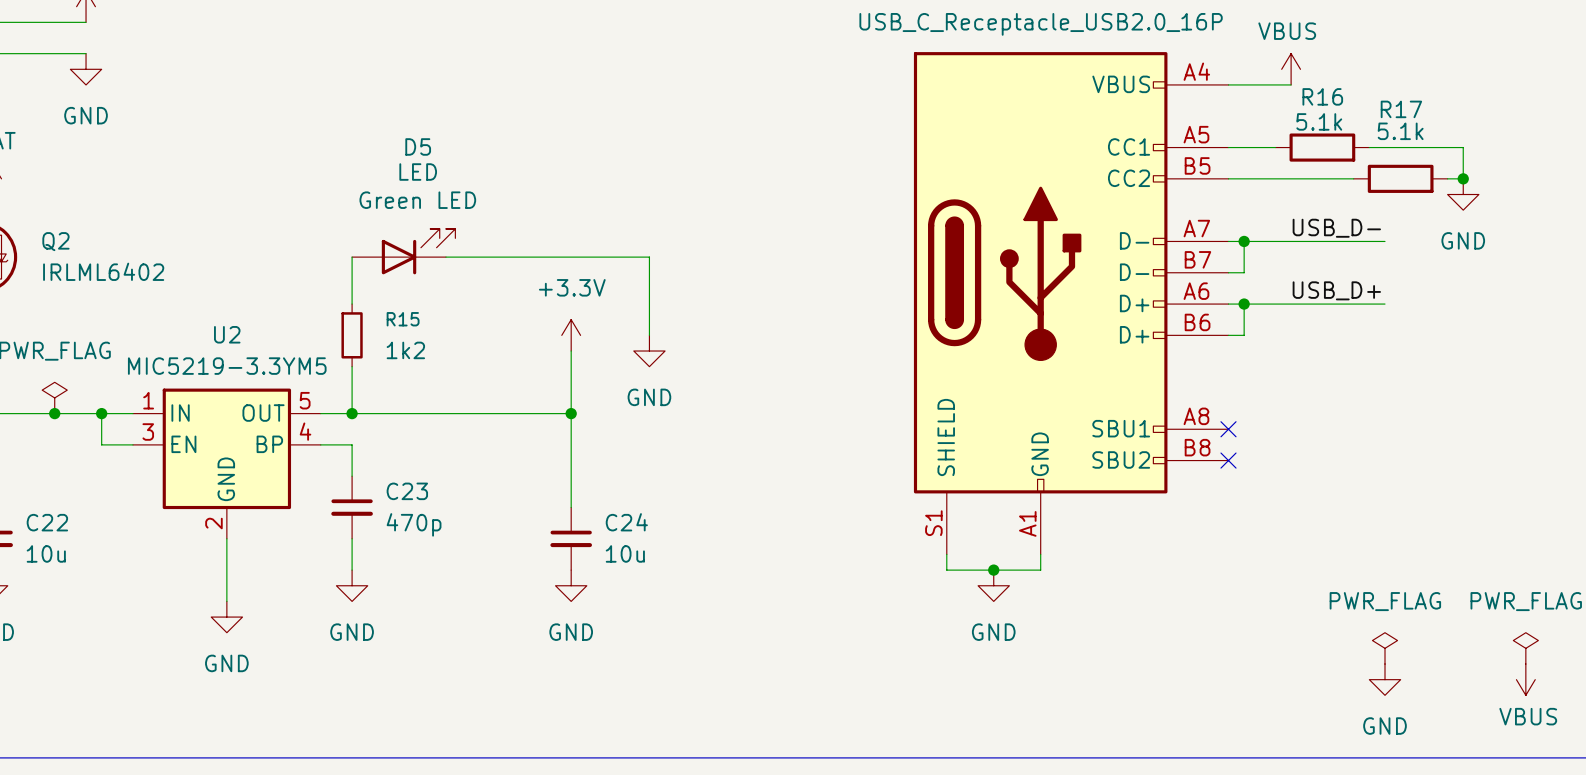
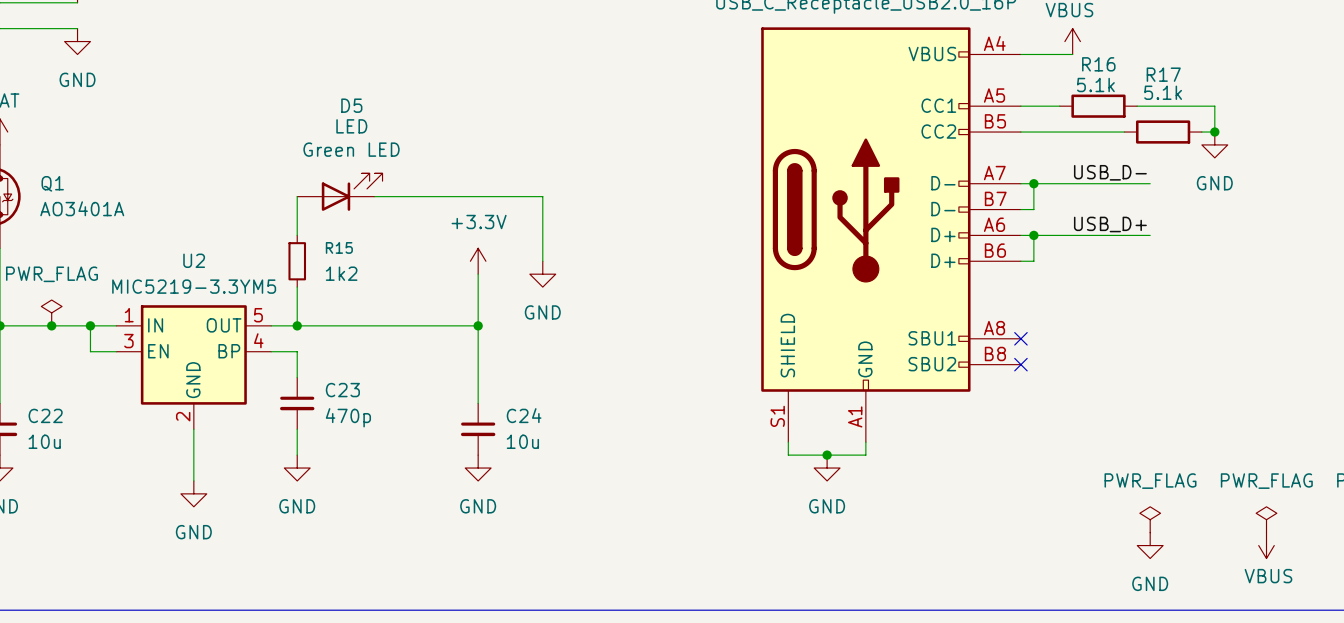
Q2 name: Q2 (55, 241) -> Q1 (52, 183)
Q2 value: IRLML6402 (103, 271) -> AO3401A (82, 208)

